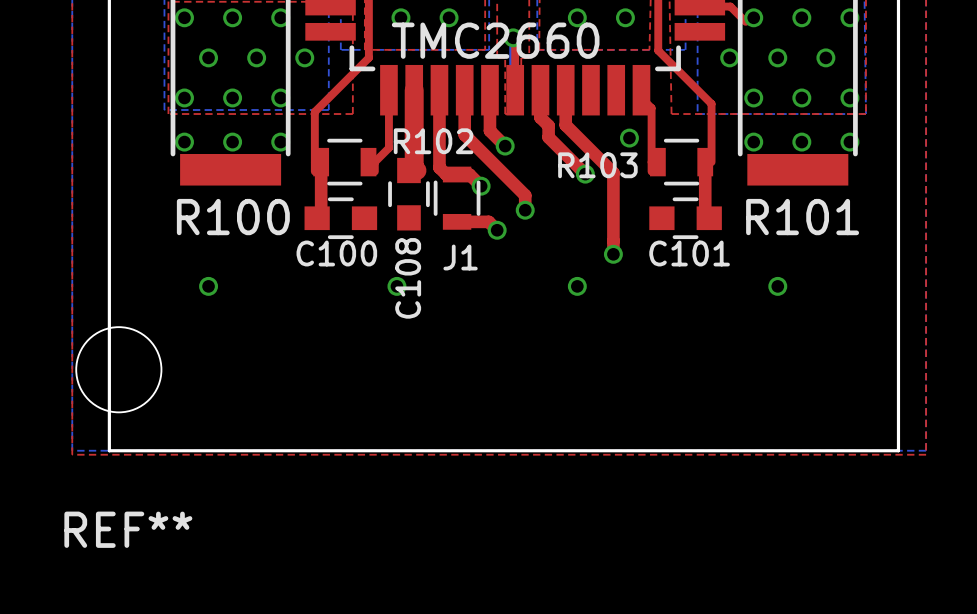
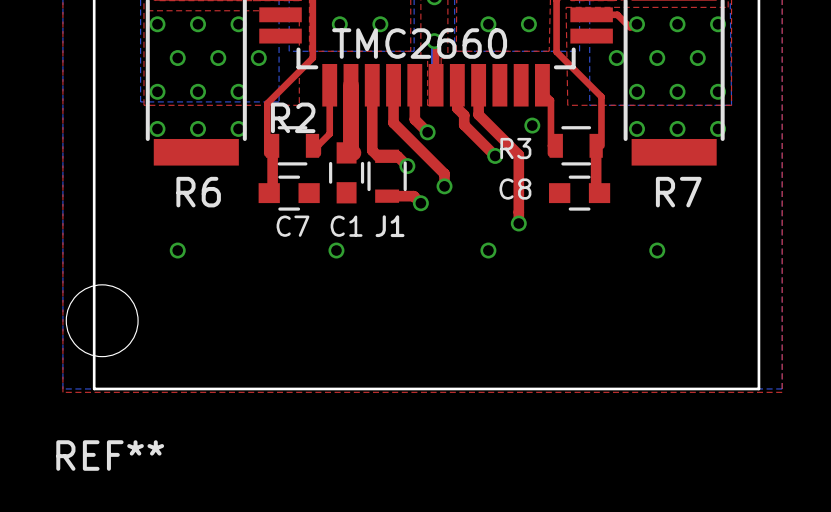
R102 name: R102 (433, 141) -> R2 (293, 117)
R103 name: R103 (597, 165) -> R3 (515, 148)
R100 name: R100 (233, 217) -> R6 (198, 192)
R101 name: R101 (802, 217) -> R7 (678, 192)
C100 name: C100 (336, 253) -> C7 (293, 226)
C101 name: C101 (689, 253) -> C8 (515, 189)
C108 name: C108 (408, 278) -> C1 (346, 226)

